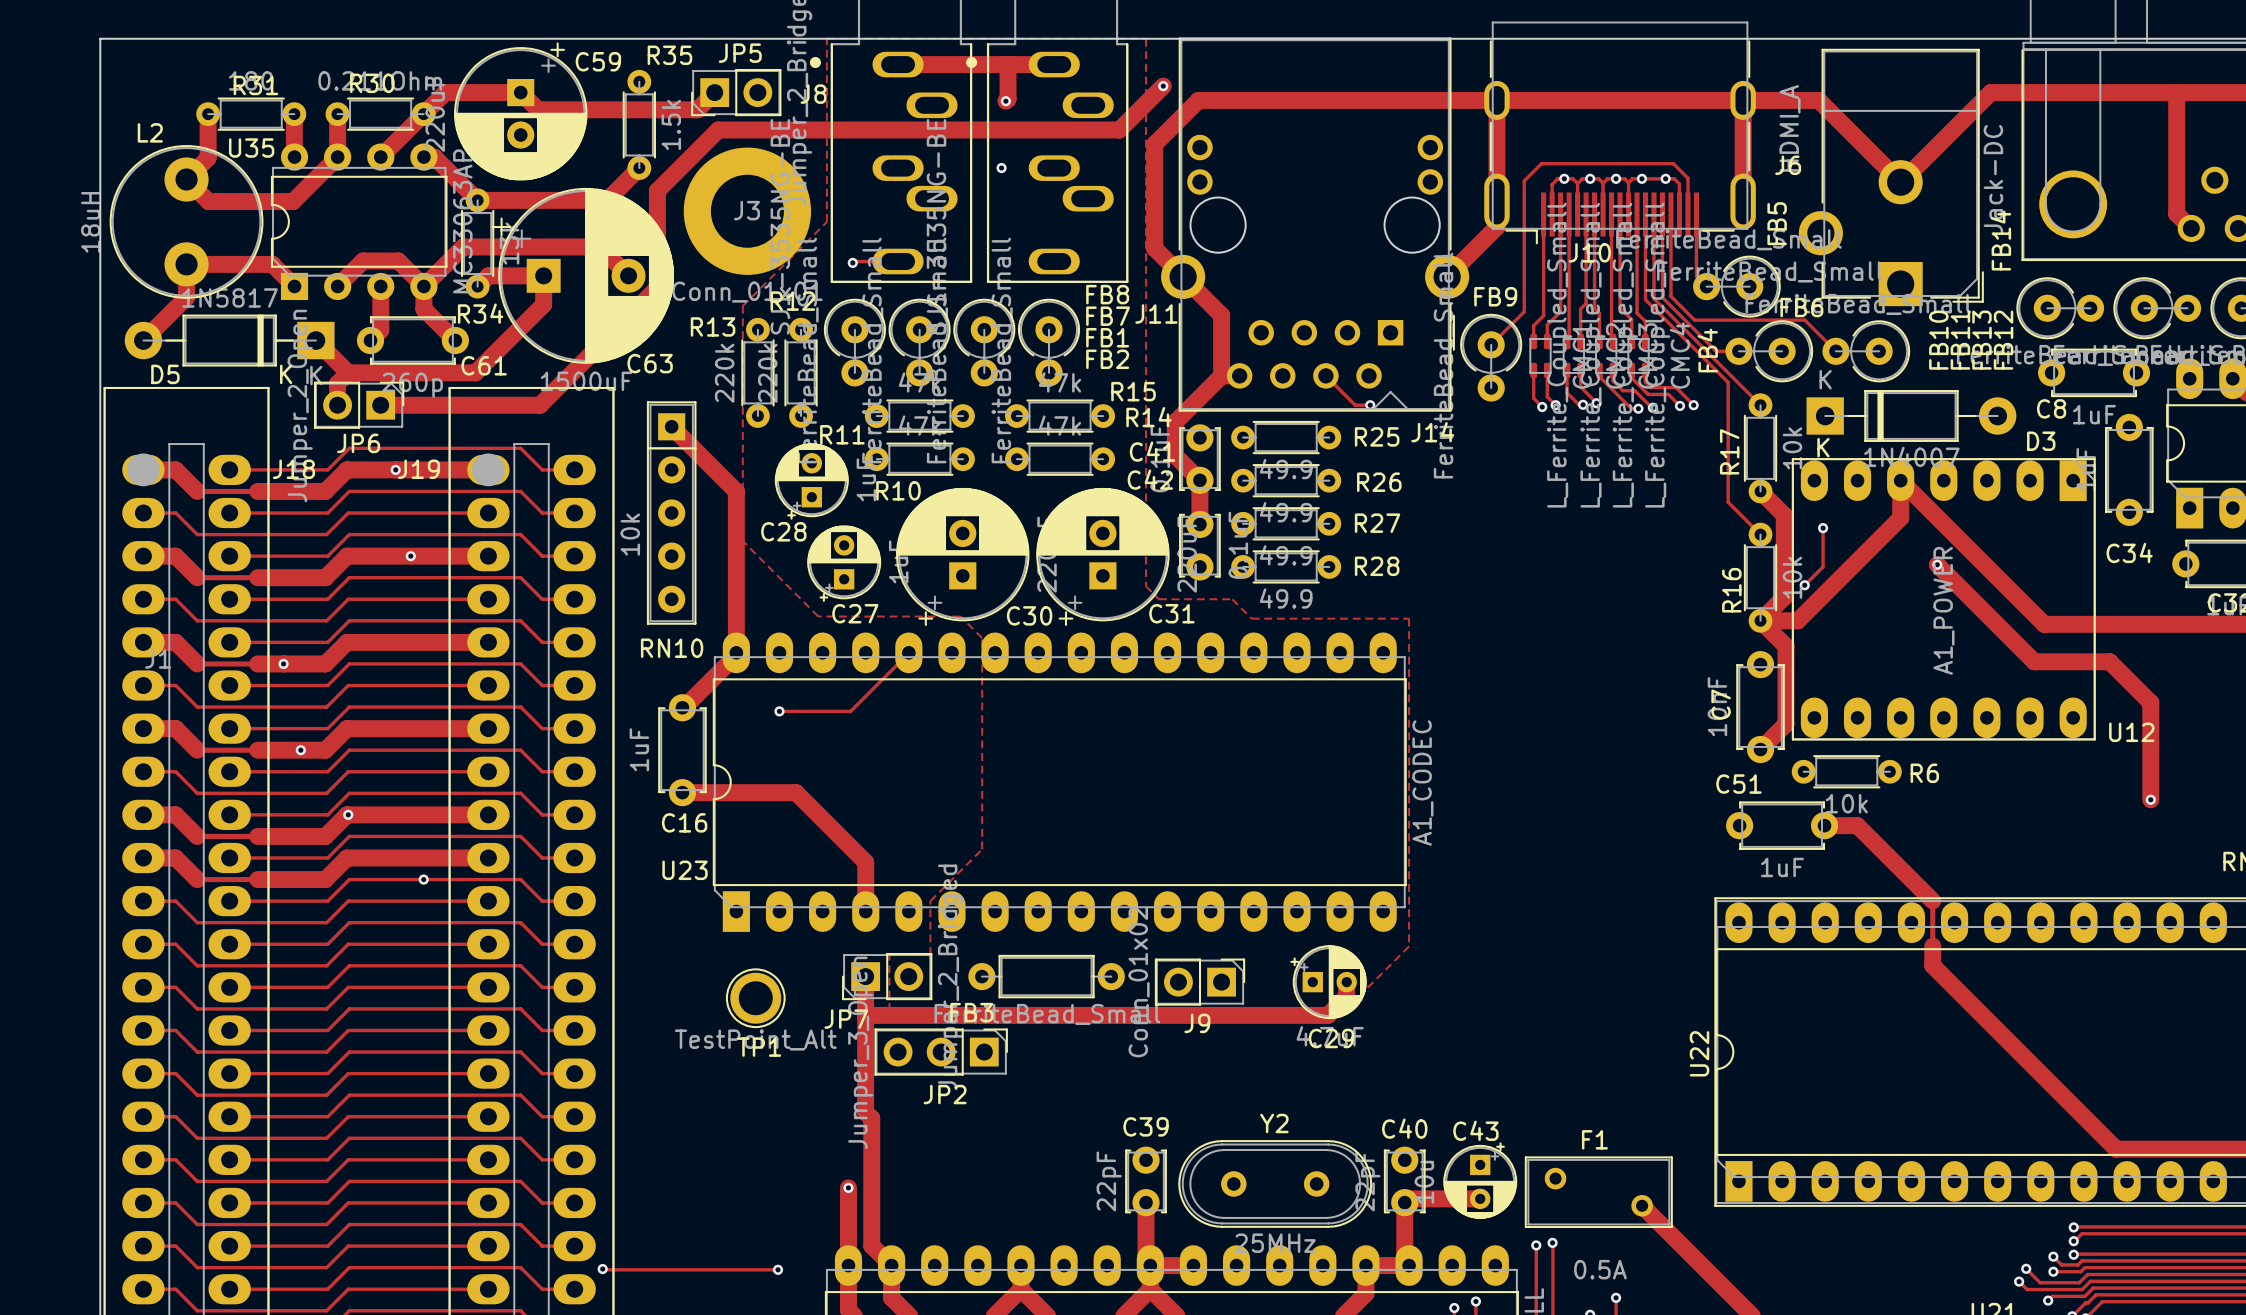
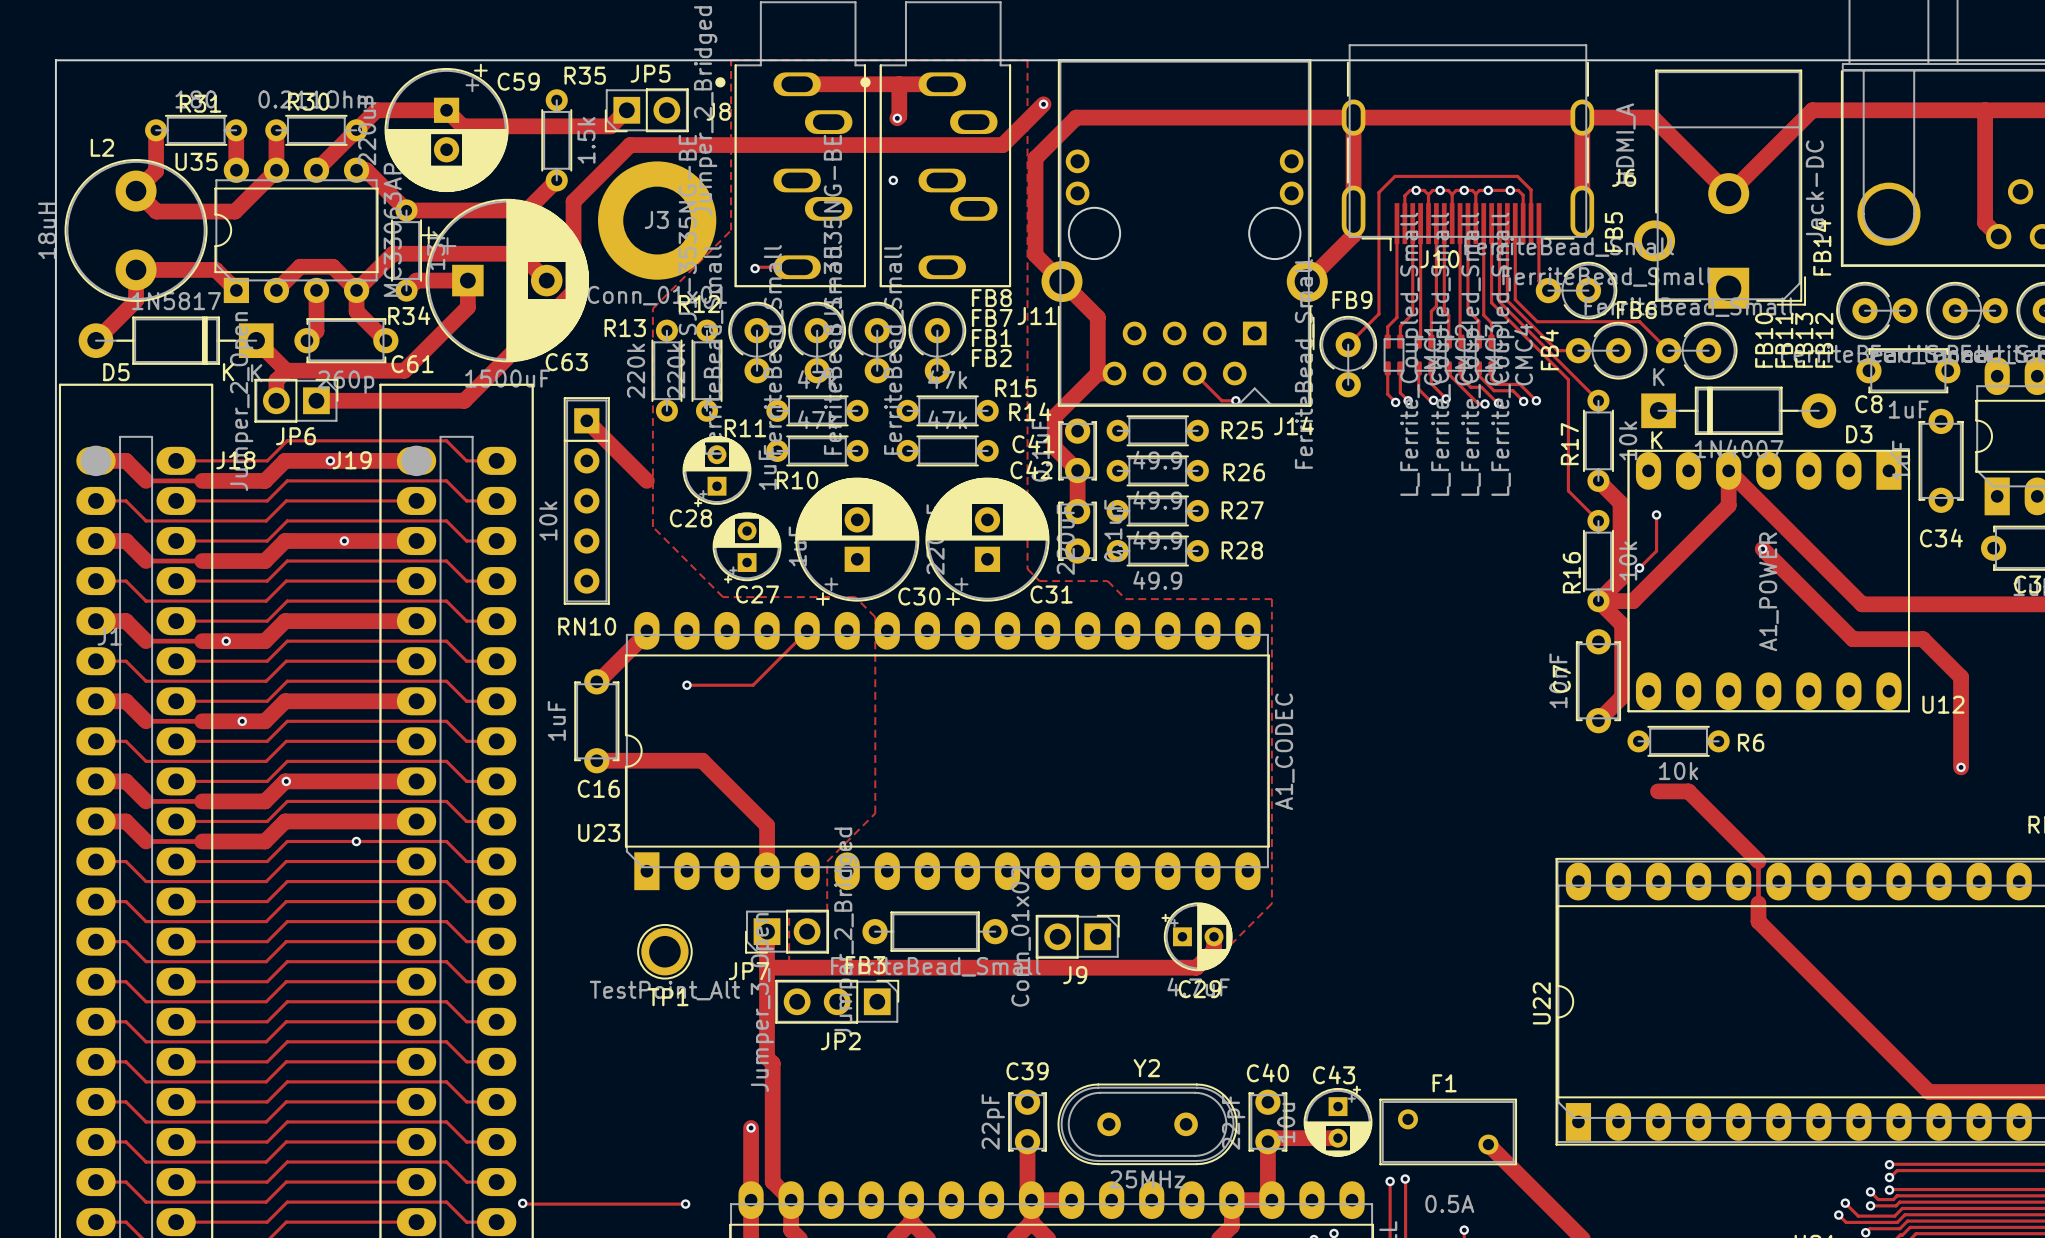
track: (736, 491) (736, 652) -> none
C51: 1uF (1782, 825) -> none

